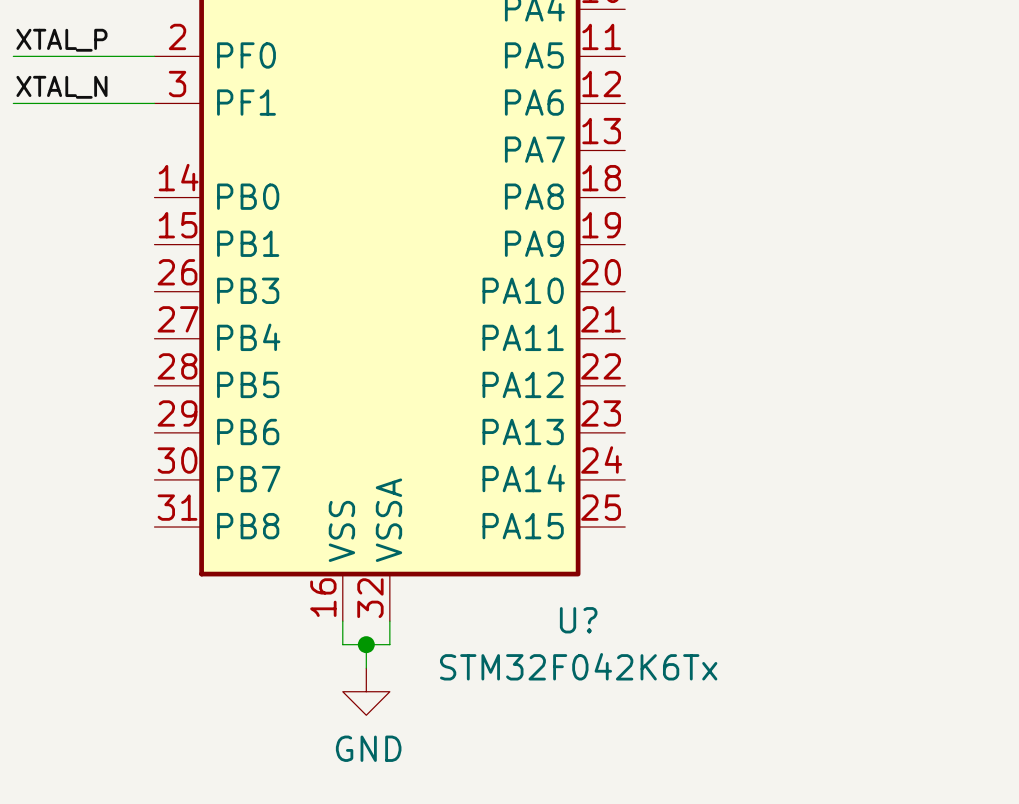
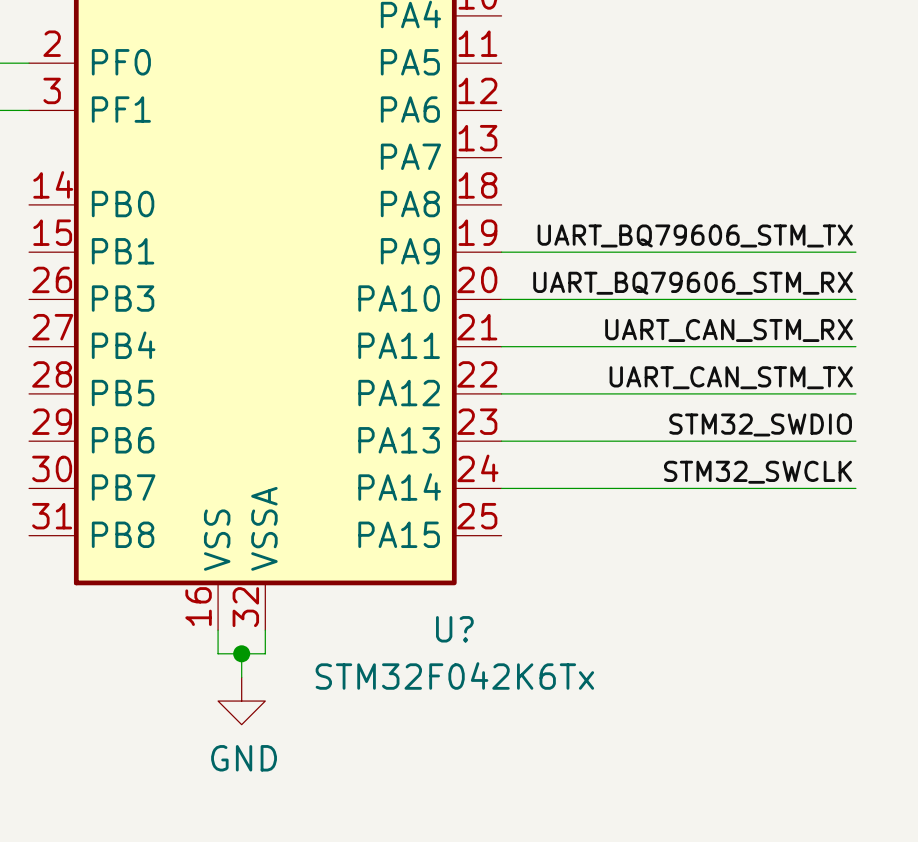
label: none -> UART_BQ79606_STM_TX (695, 235)
wire: none -> (501, 252) (855, 252)
label: none -> UART_BQ79606_STM_RX (693, 283)
wire: none -> (501, 299) (855, 299)
label: none -> UART_CAN_STM_RX (729, 330)
wire: none -> (501, 346) (855, 346)
label: none -> UART_CAN_STM_TX (731, 377)
wire: none -> (501, 393) (855, 393)
label: none -> STM32_SWDIO (760, 424)
wire: none -> (501, 441) (855, 441)
label: none -> STM32_SWCLK (757, 472)
wire: none -> (501, 488) (855, 488)

